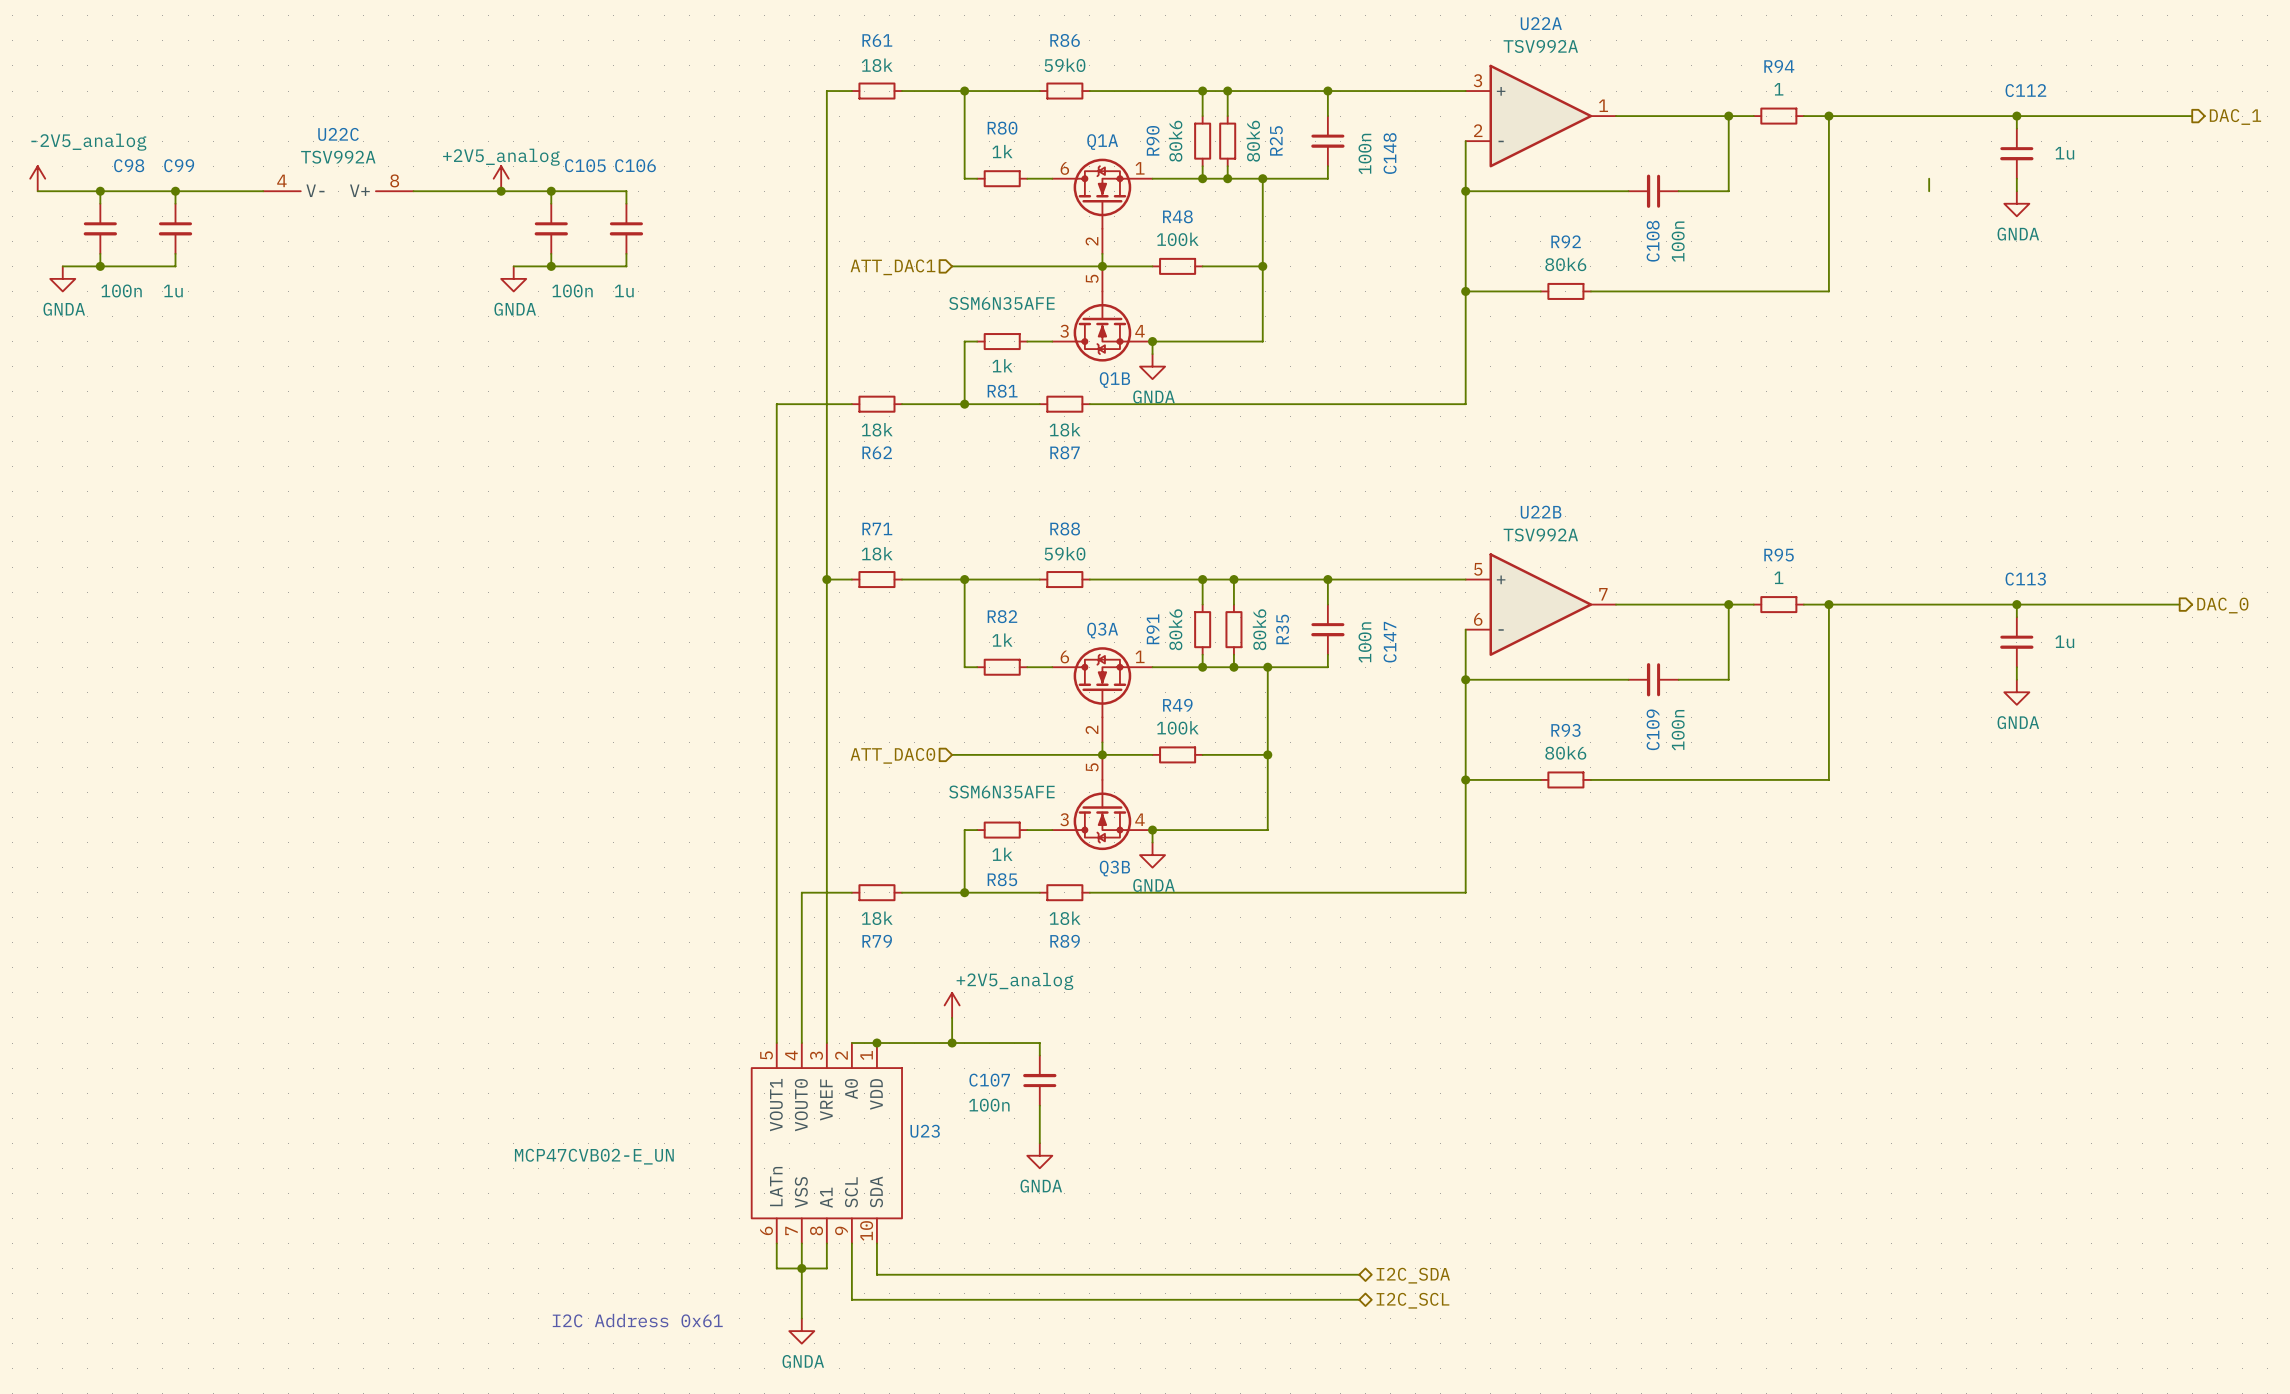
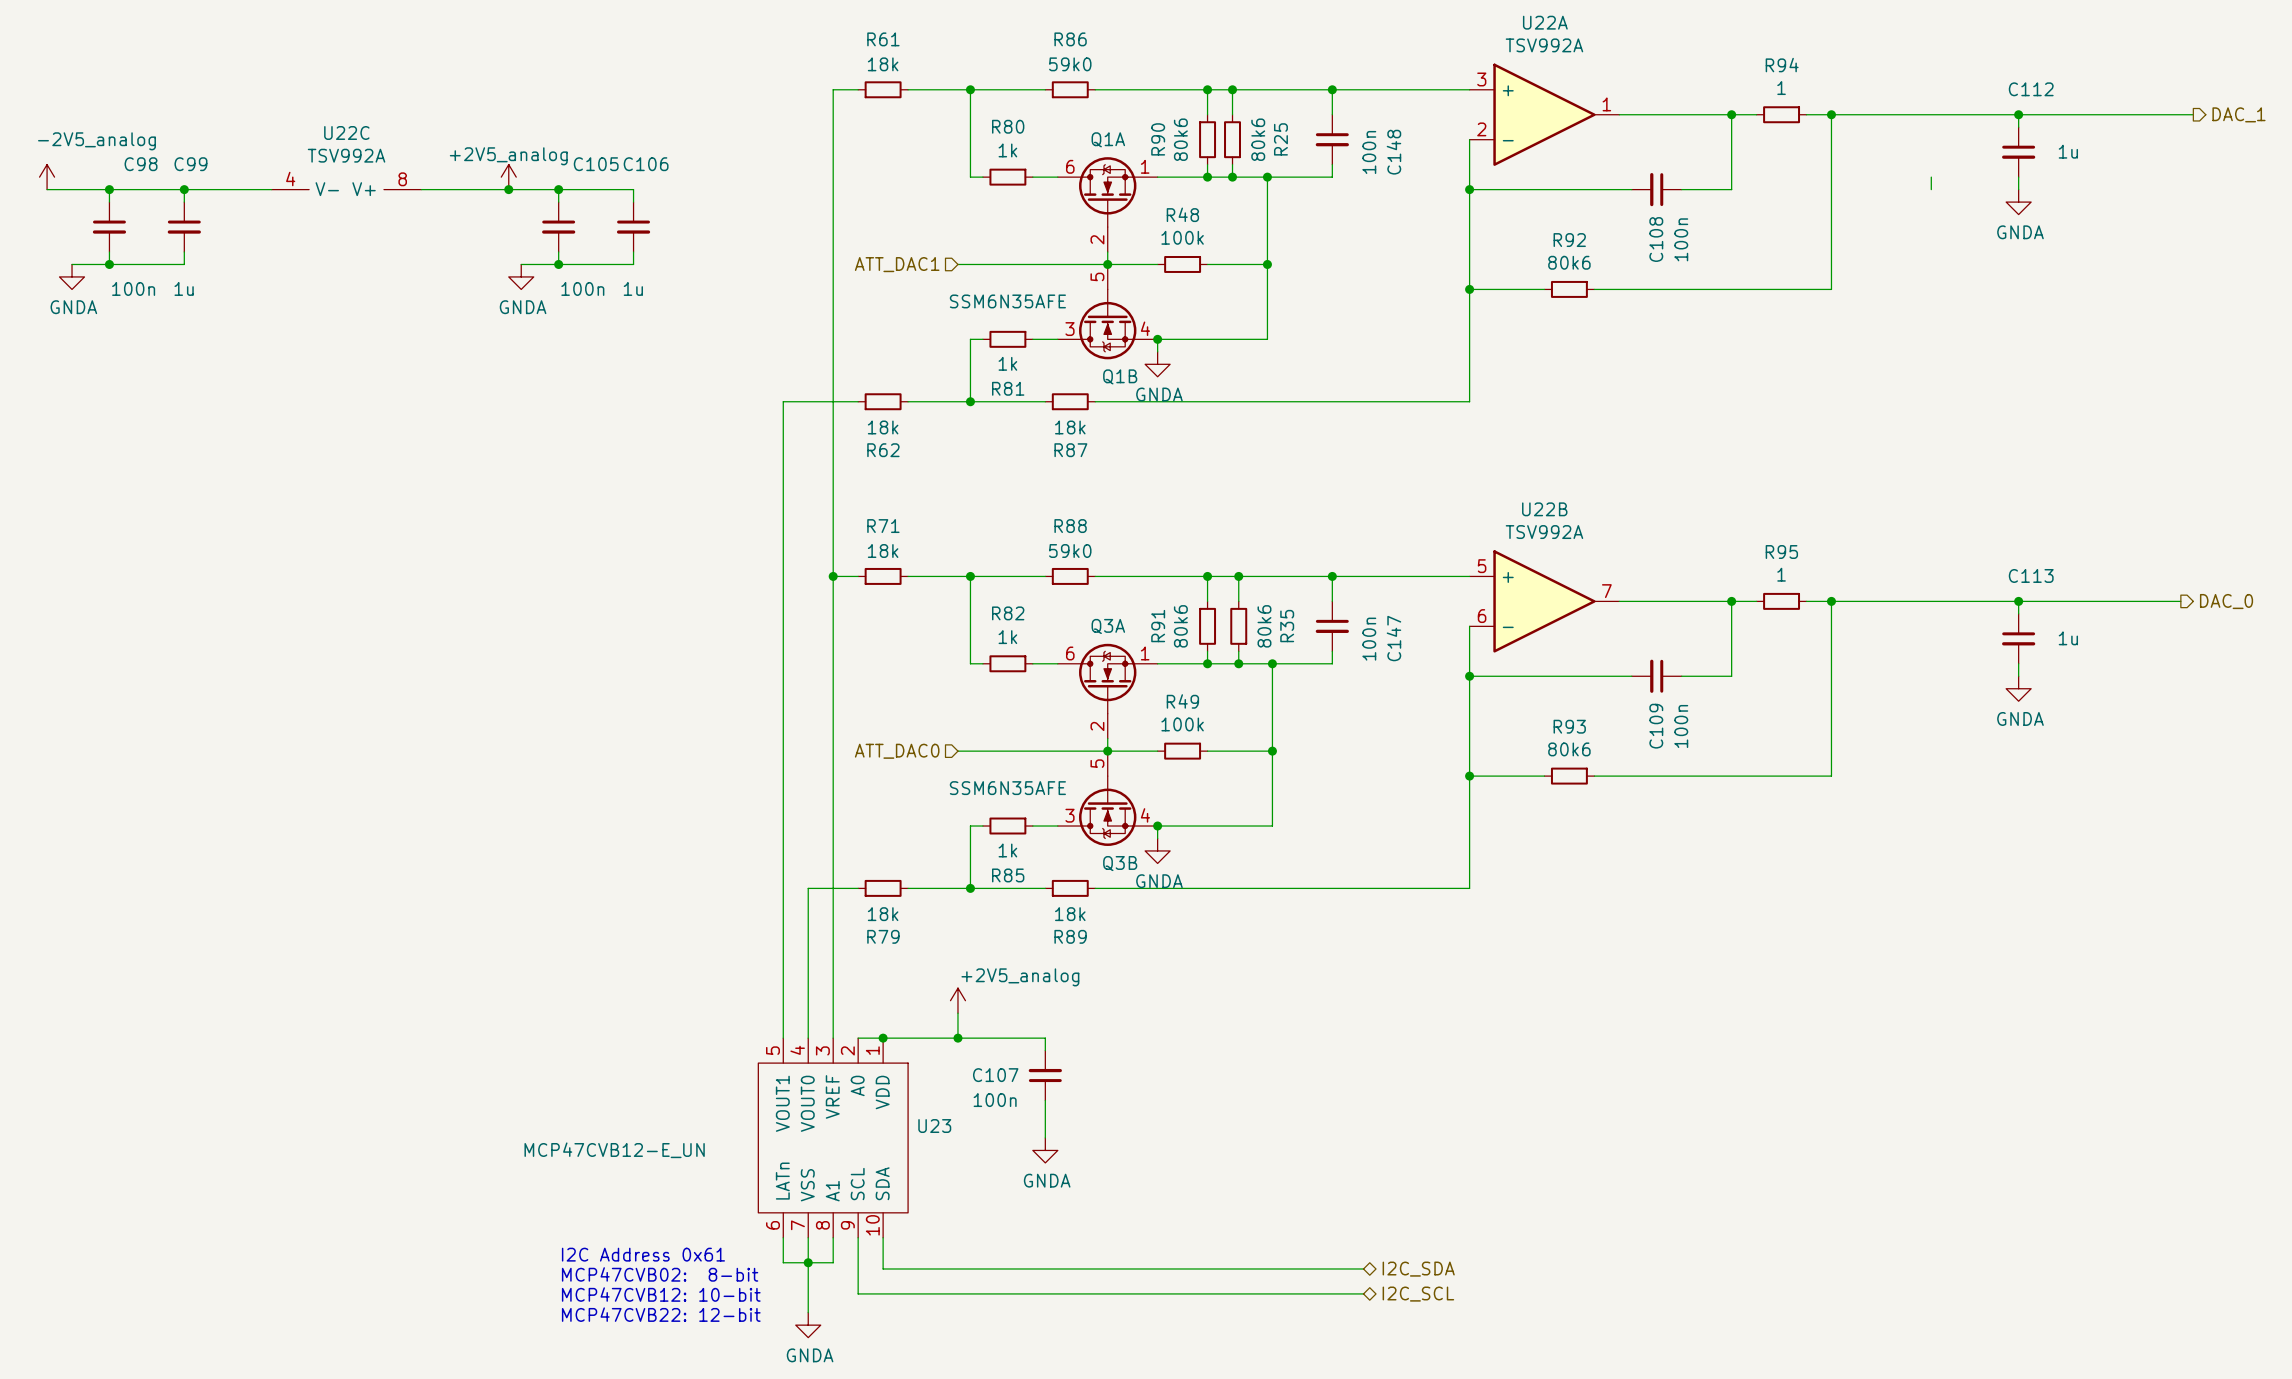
U23 value: MCP47CVB02-E_UN (594, 1156) -> MCP47CVB12-E_UN (614, 1150)
text: none -> I2C Address 0x61 (643, 1254)
text: none -> MCP47CVB02: 8-bit (660, 1274)
text: none -> MCP47CVB12: 10-bit (661, 1294)
text: I2C Address 0x61 (637, 1320) -> MCP47CVB22: 12-bit (661, 1314)

